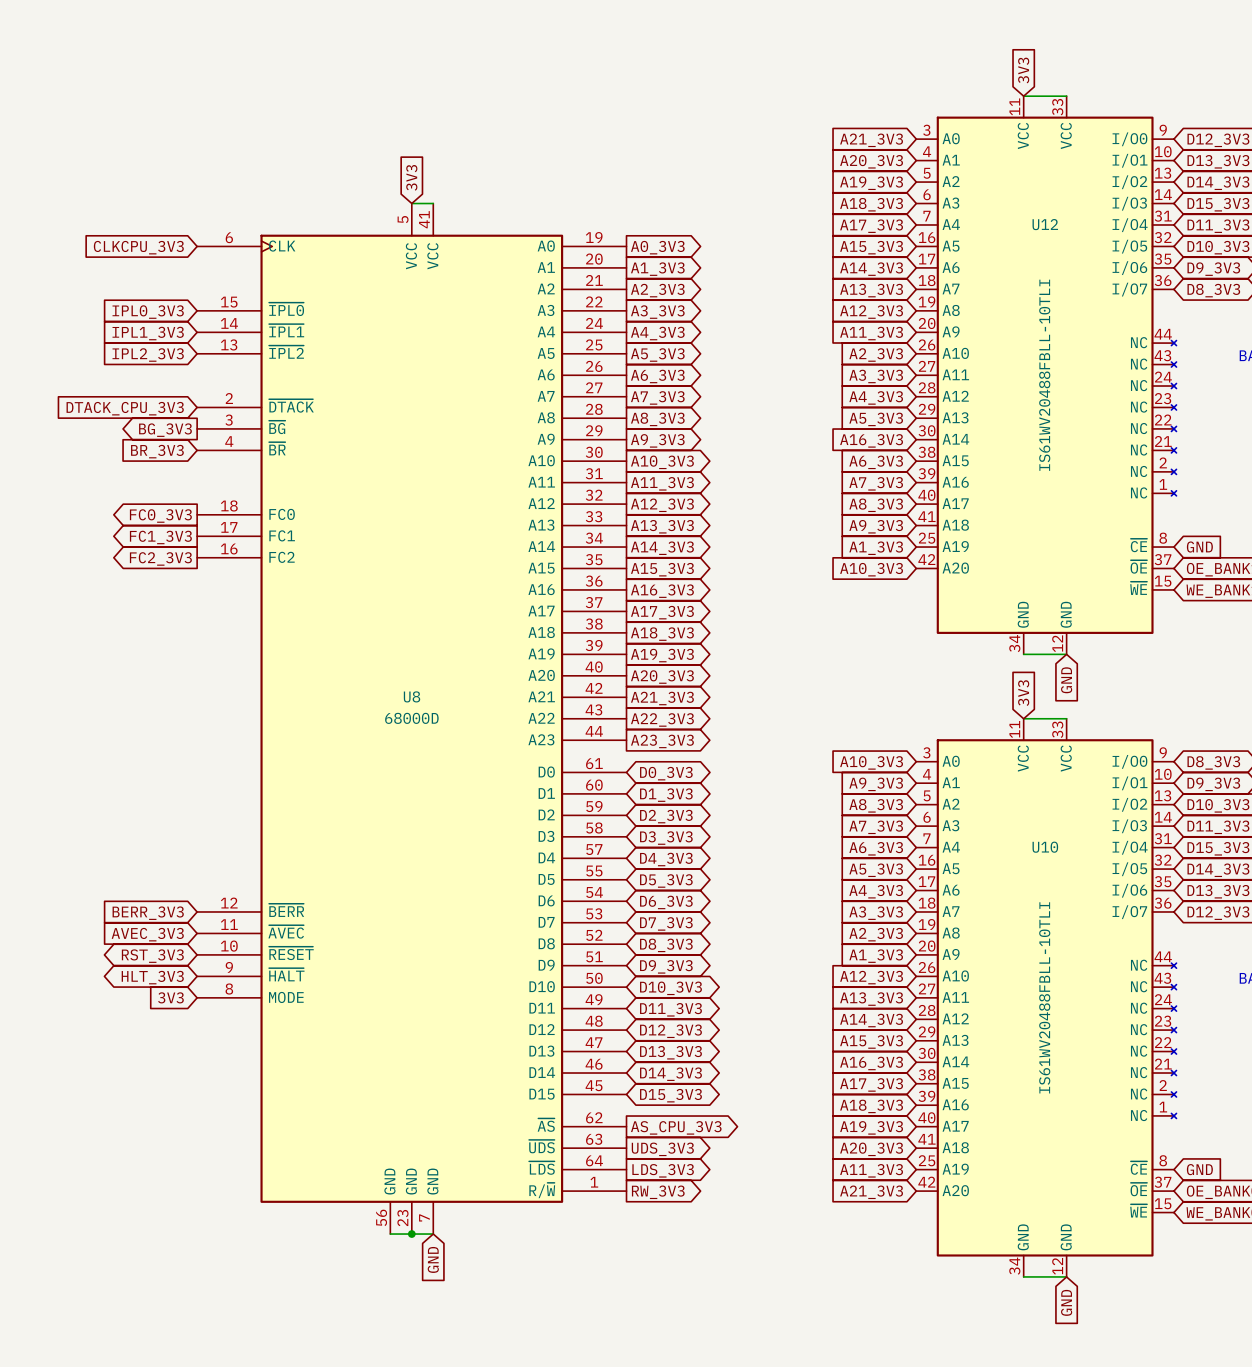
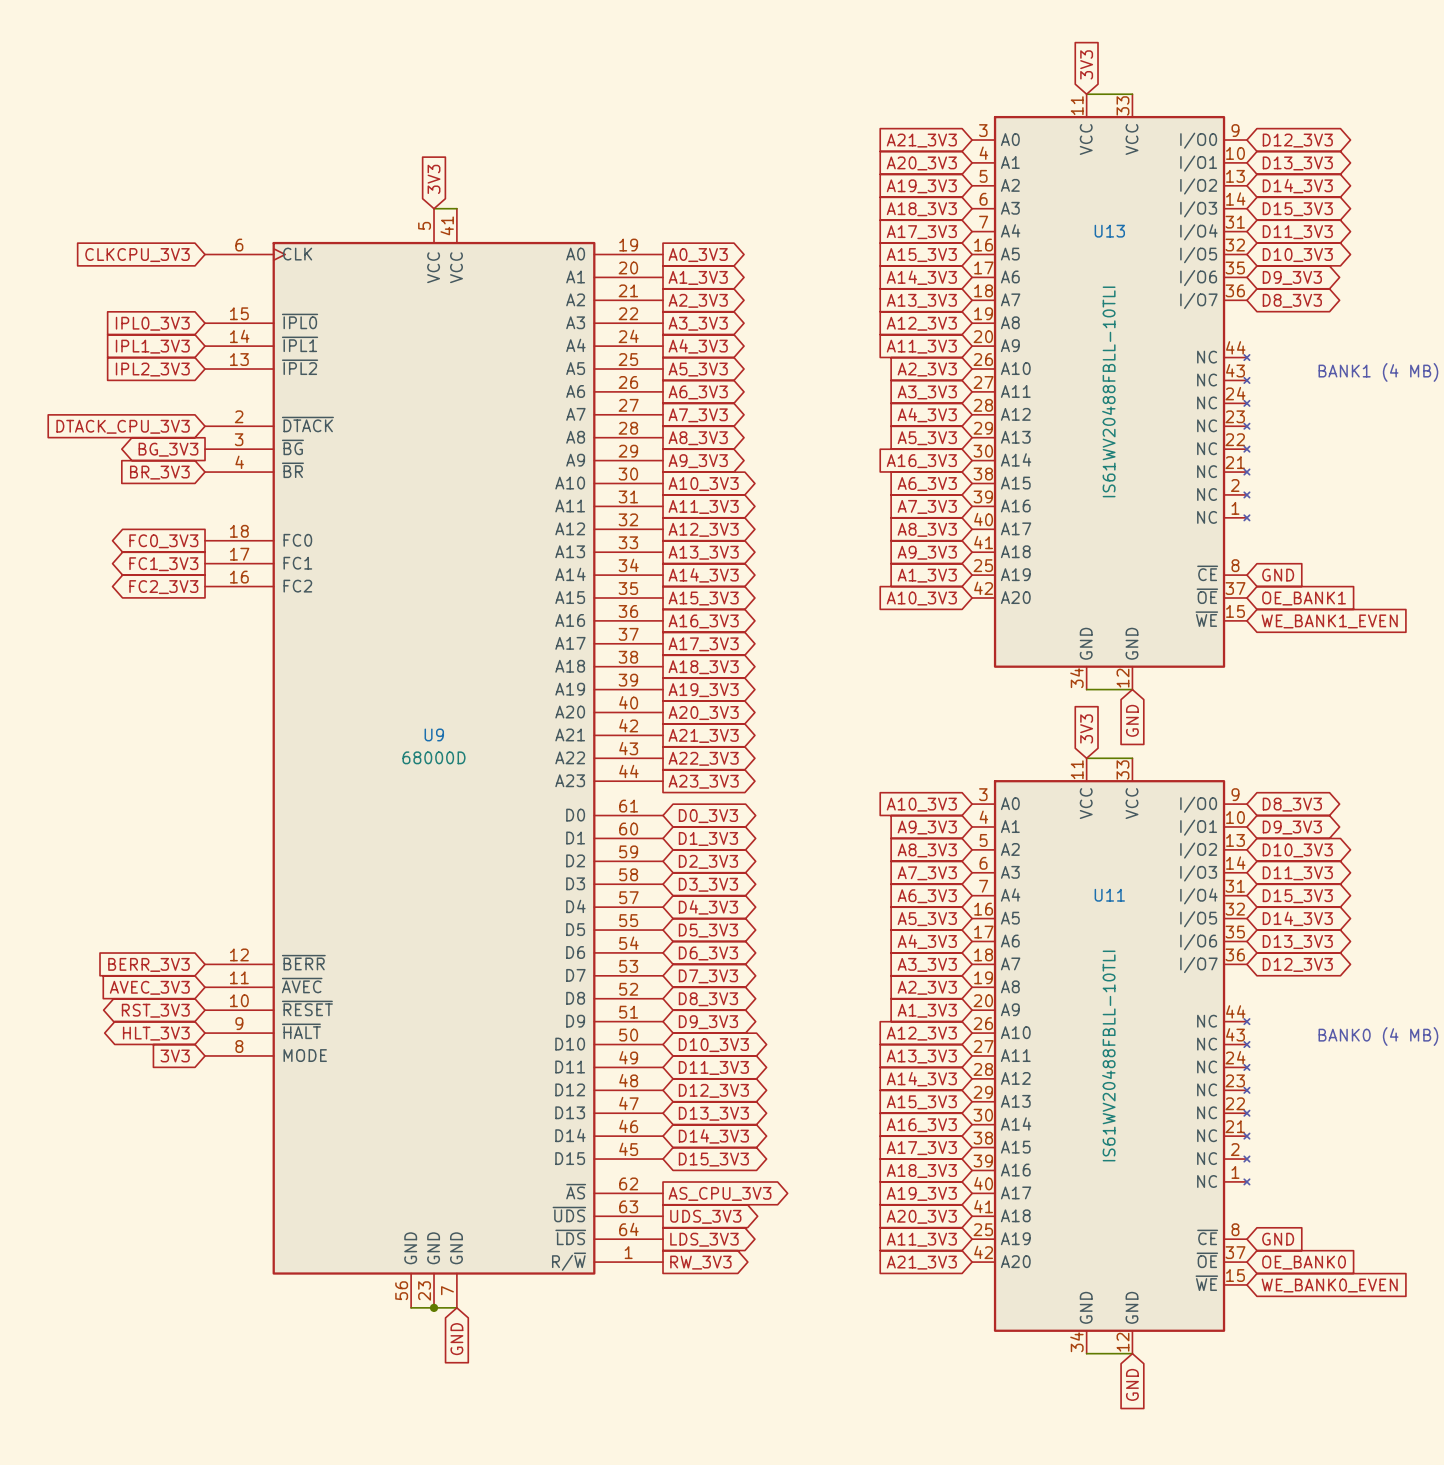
U12 name: U12 (1045, 224) -> U13 (1109, 231)
U8 name: U8 (412, 696) -> U9 (434, 734)
U10 name: U10 (1045, 847) -> U11 (1109, 895)

